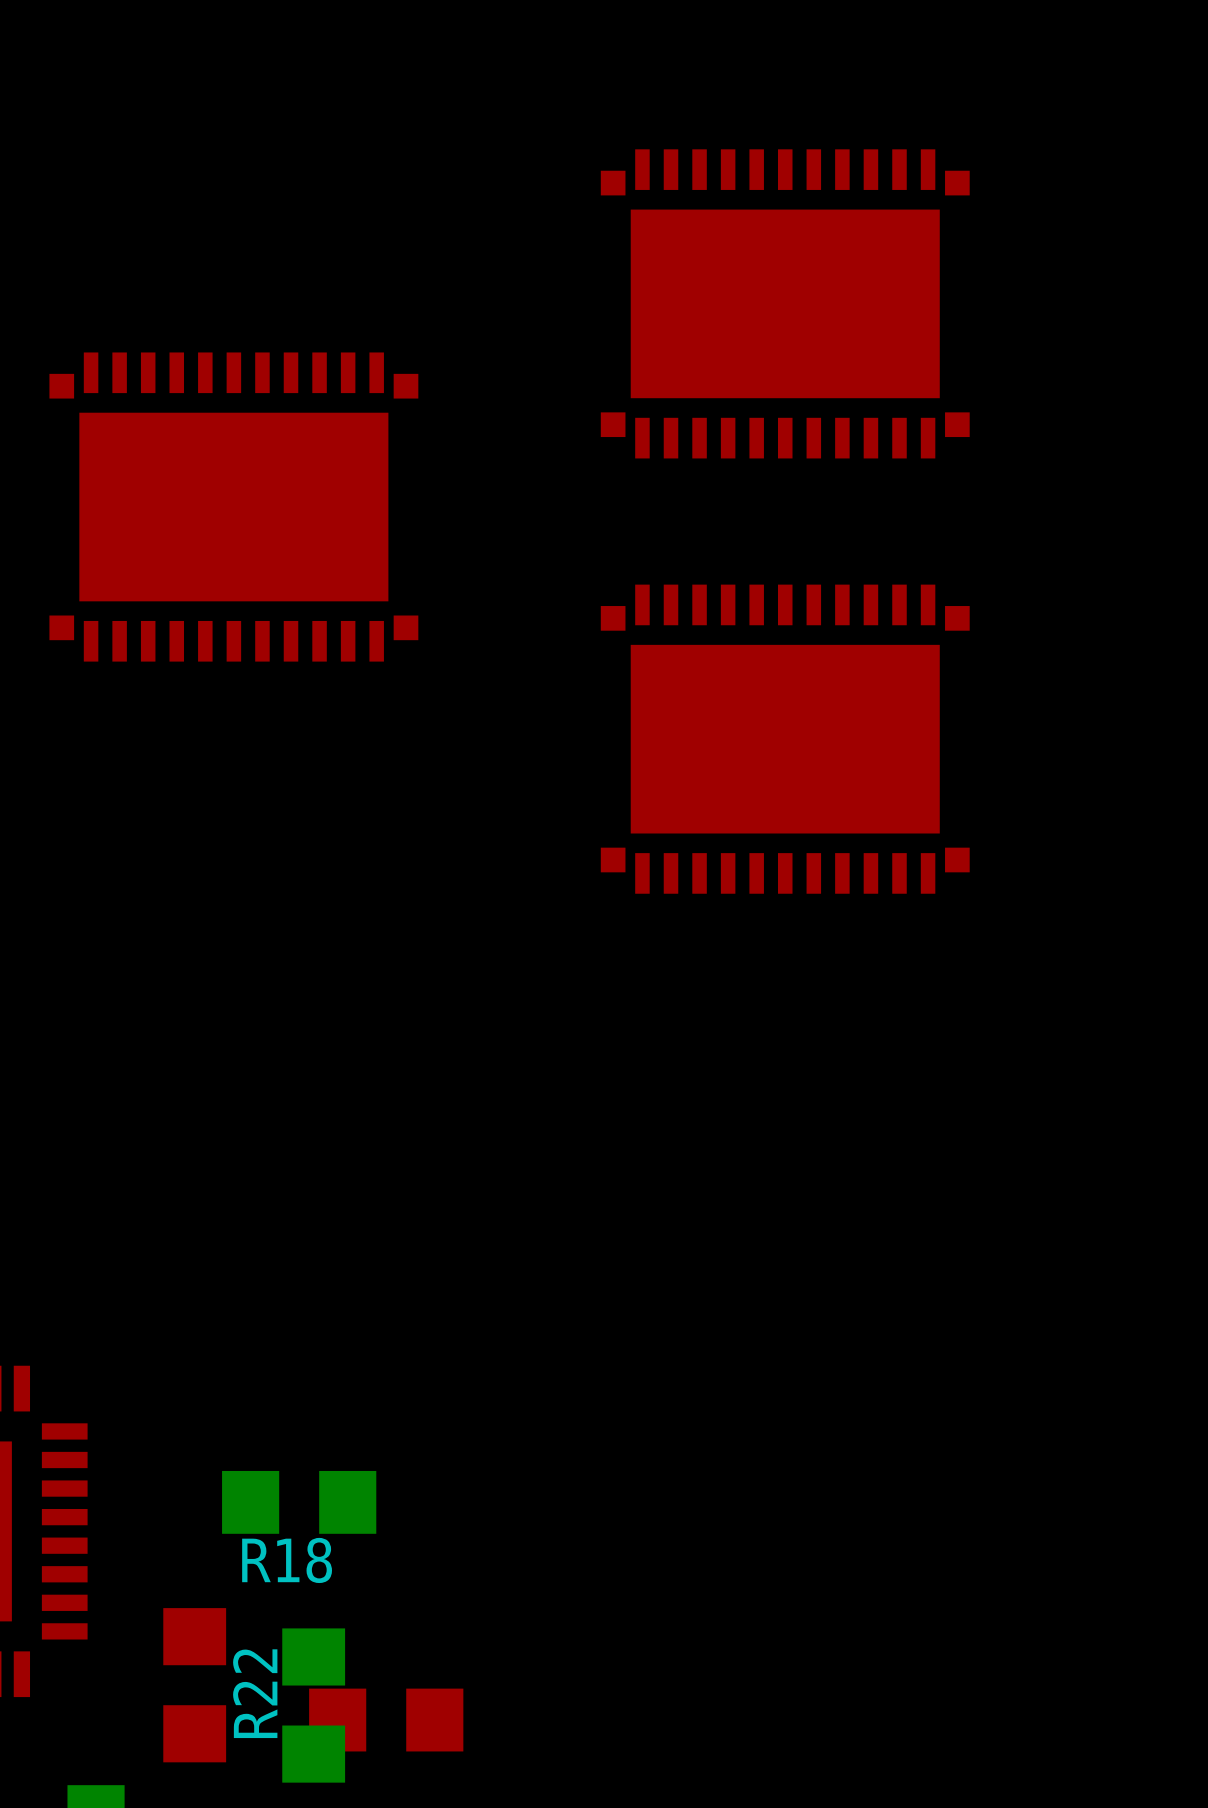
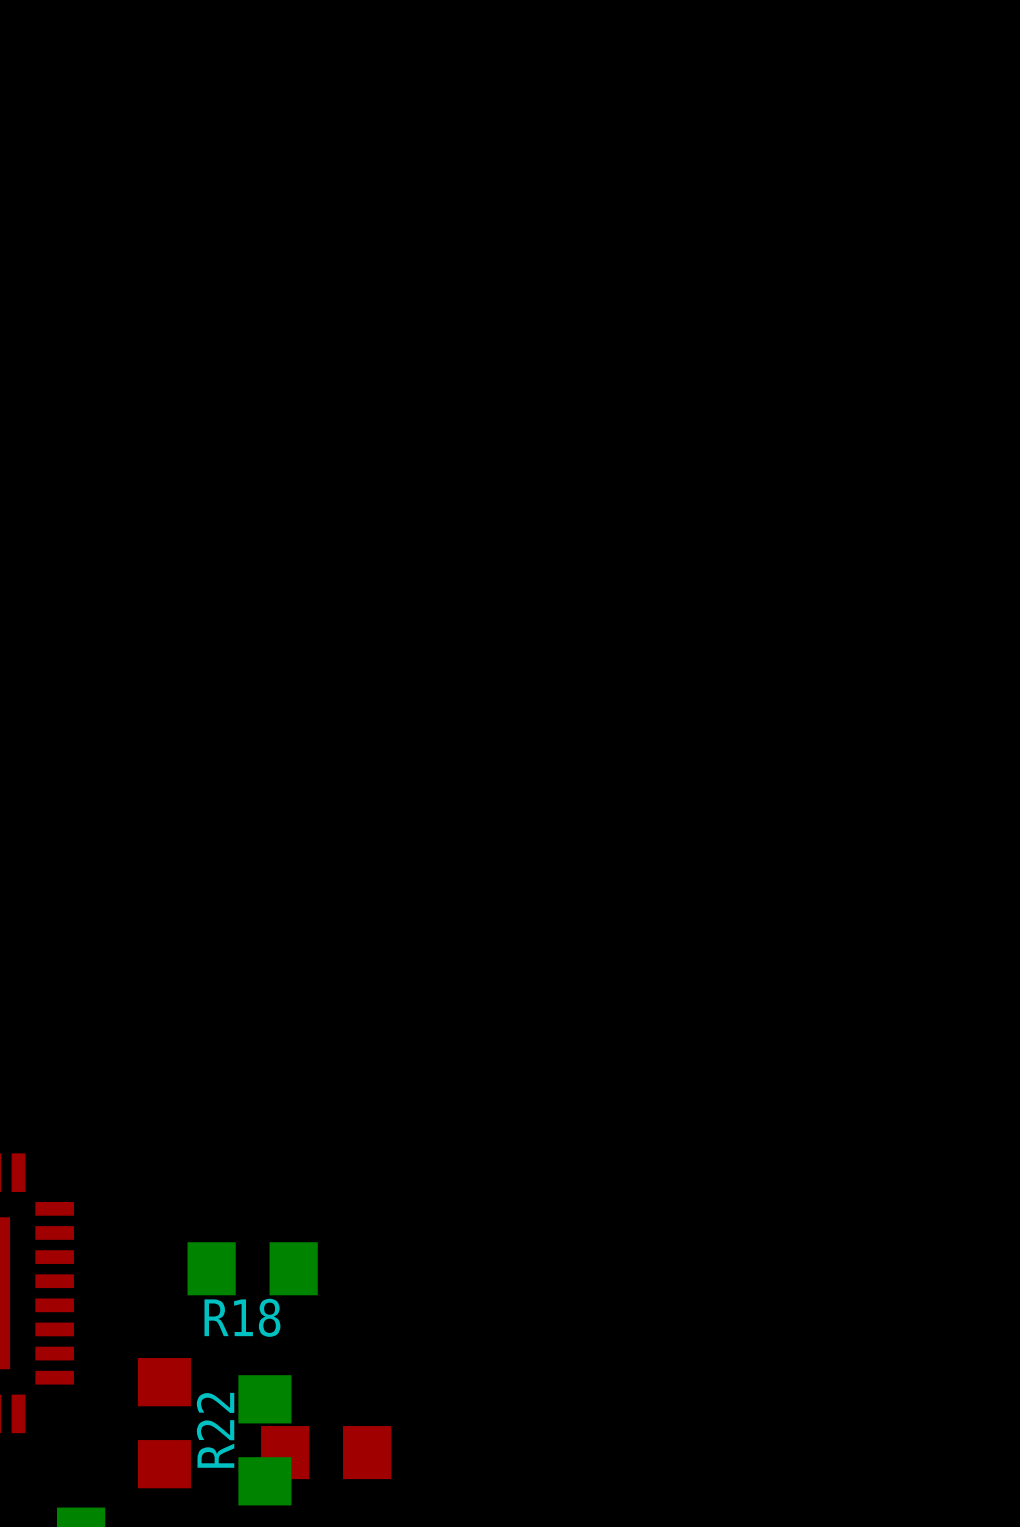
part: (785, 303) -> none
part: (233, 507) -> none
part: (785, 739) -> none

